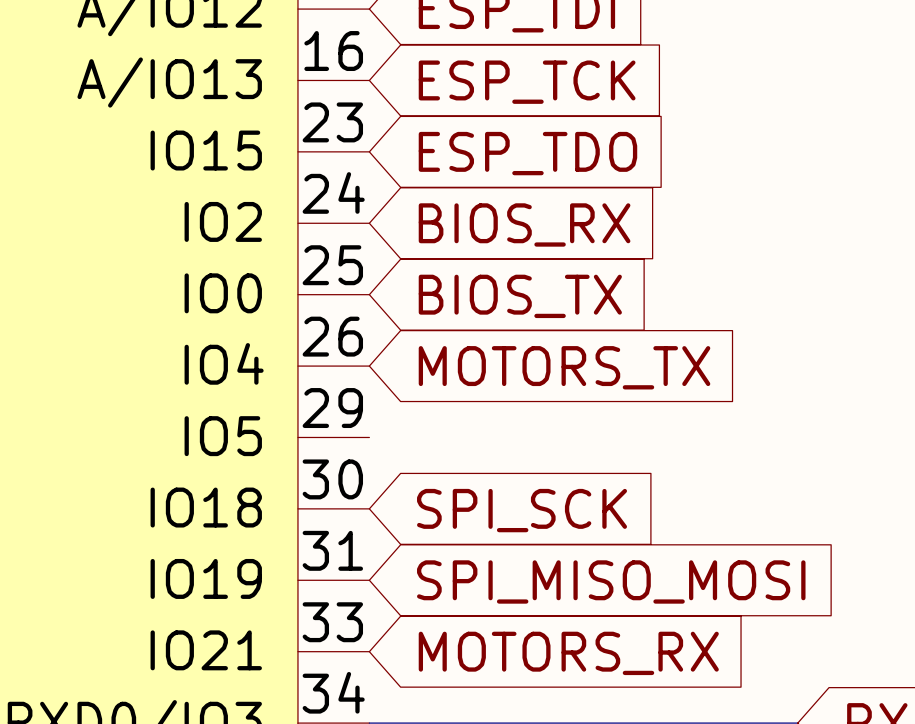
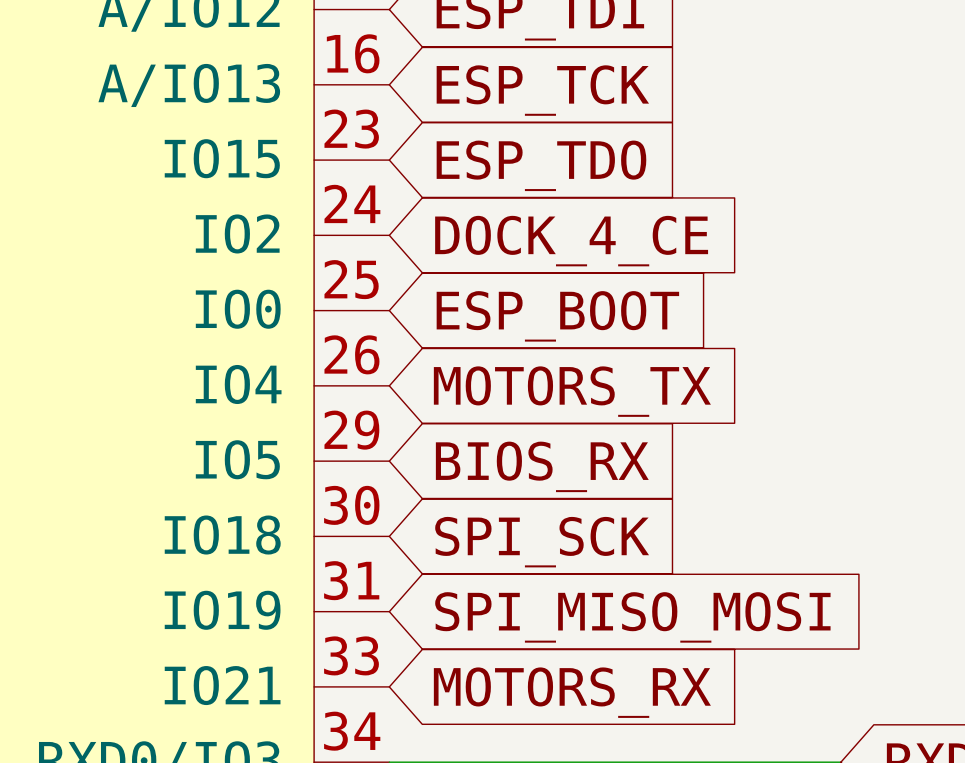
global label: BIOS_RX (524, 224) -> DOCK_4_CE (571, 241)
global label: BIOS_TX (520, 296) -> ESP_BOOT (557, 316)
global label: none -> BIOS_RX (542, 466)

